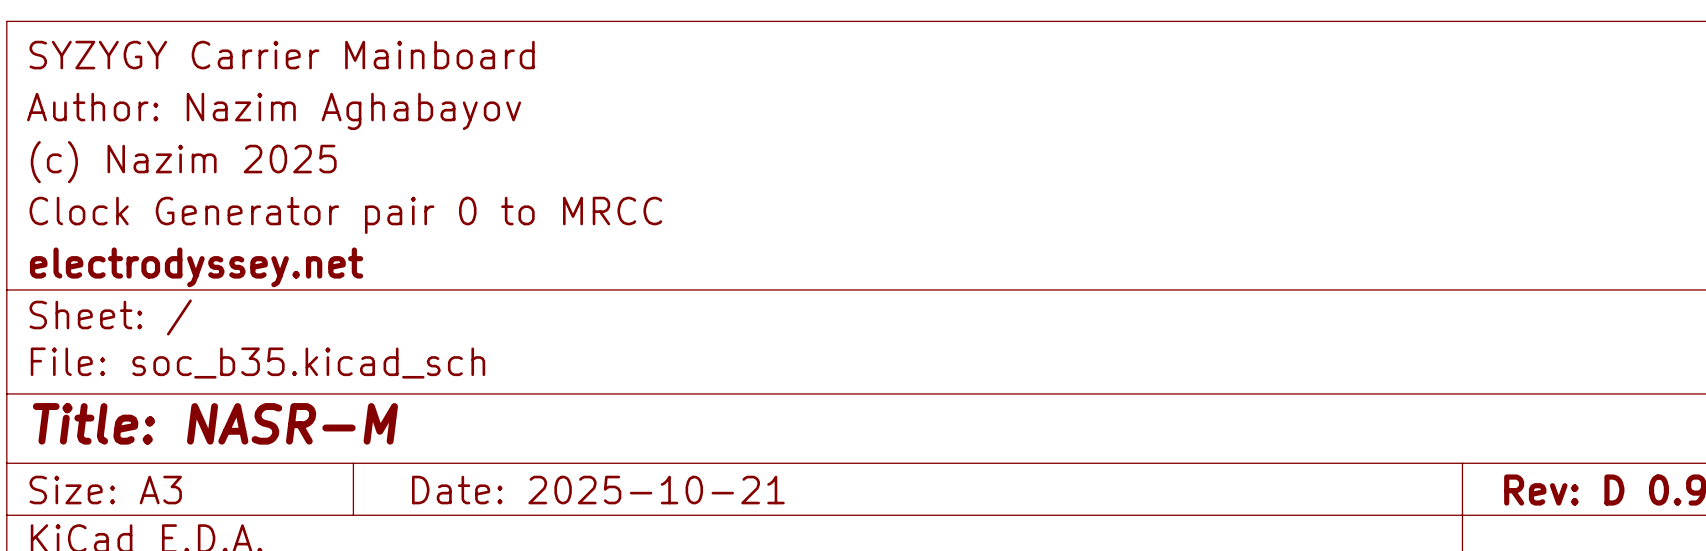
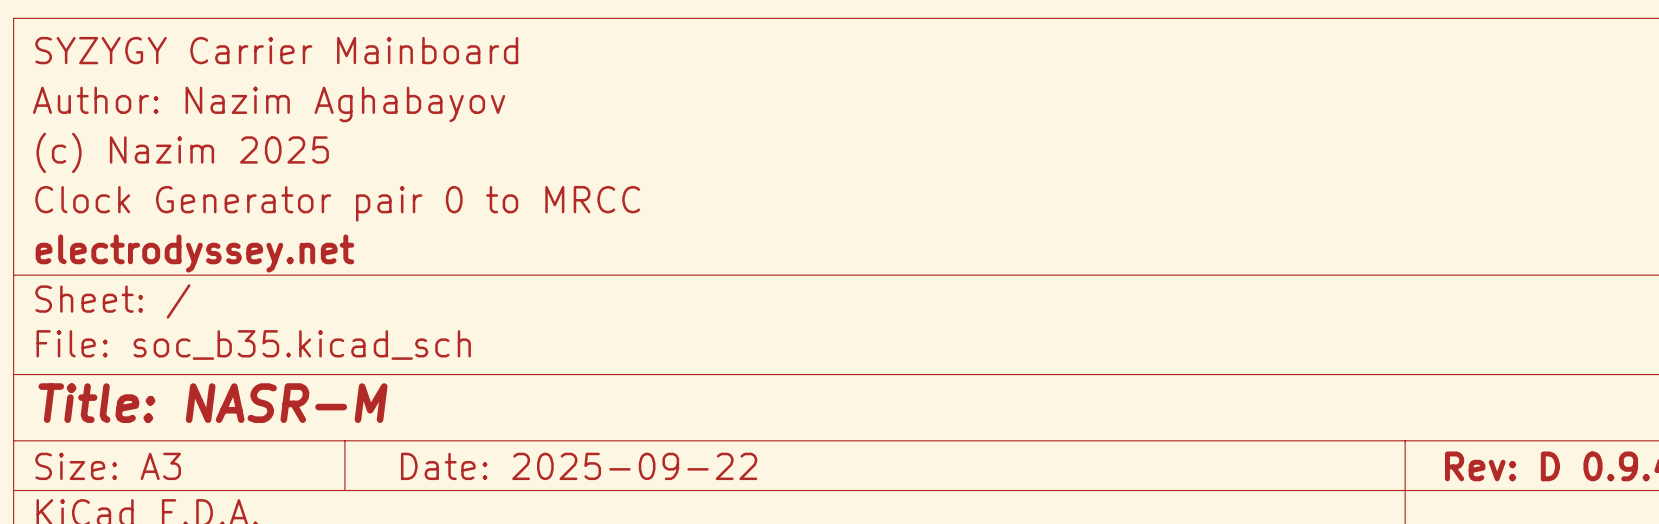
title block: Date: 2025-10-21 (598, 490) -> Date: 2025-09-22 (579, 466)

